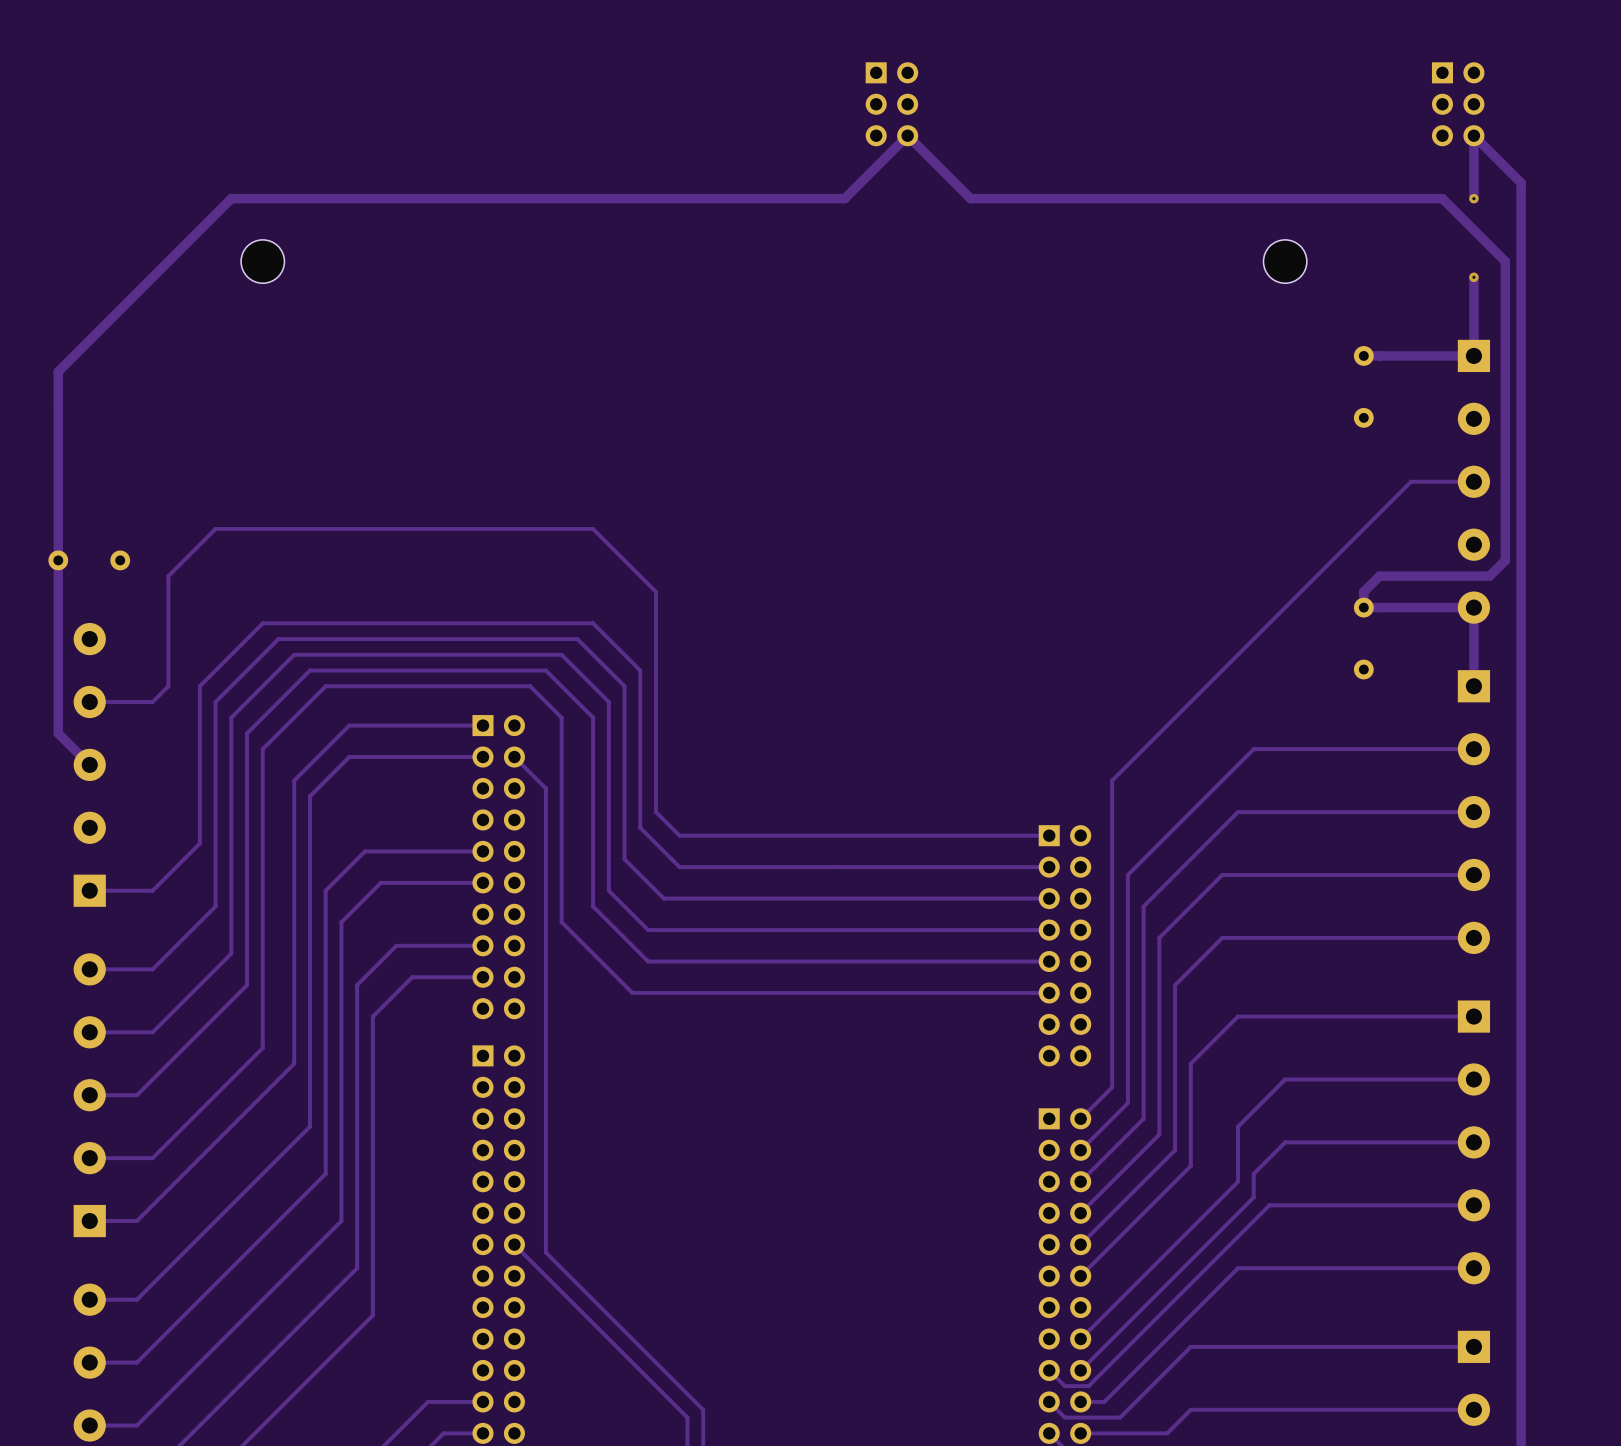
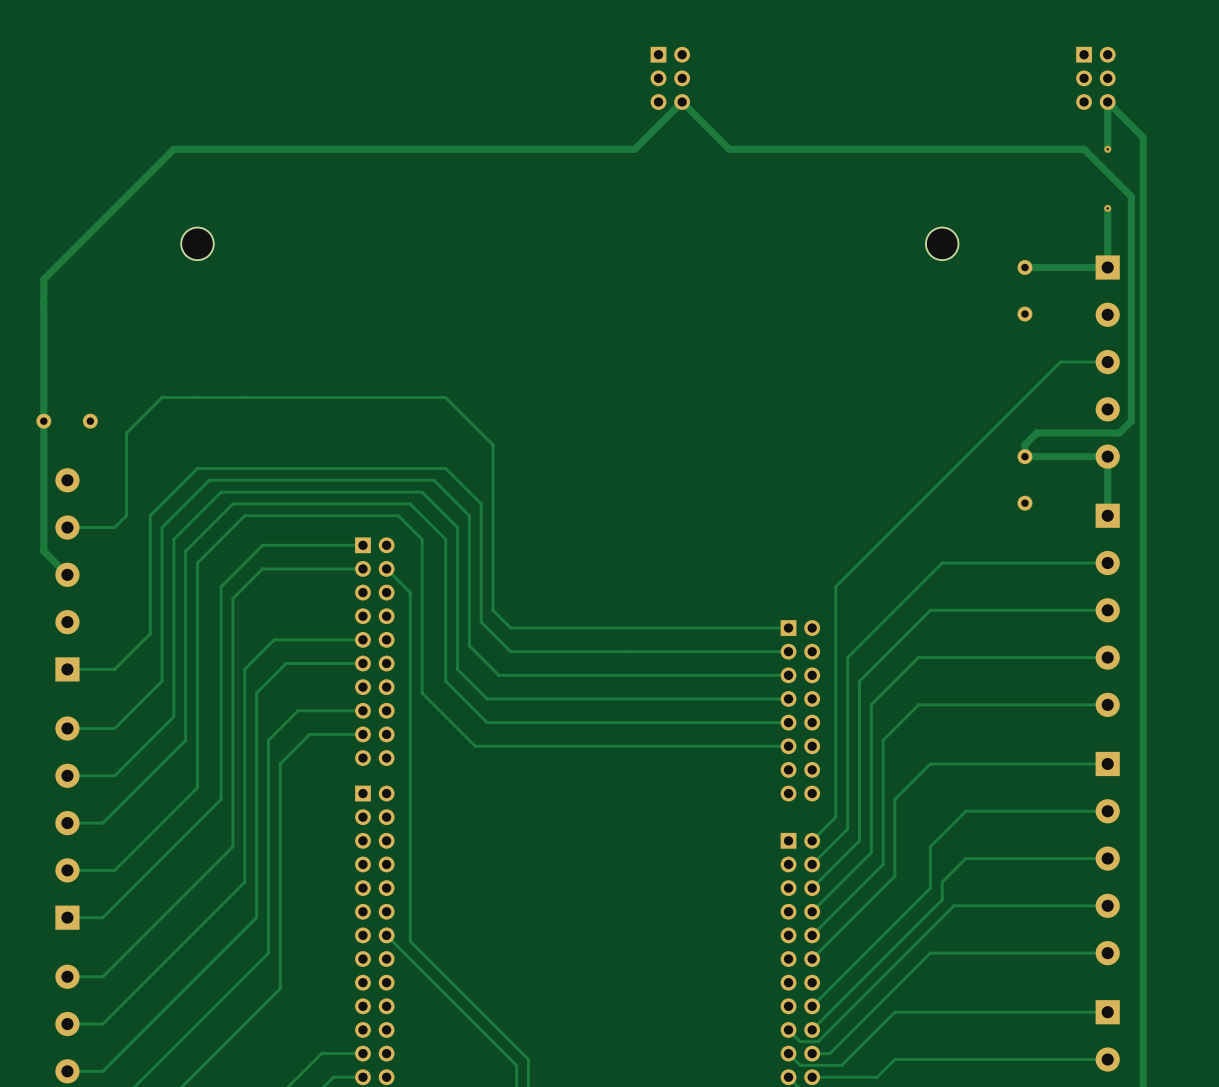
part position: (262, 261) -> (197, 243)
part position: (1285, 261) -> (942, 243)

